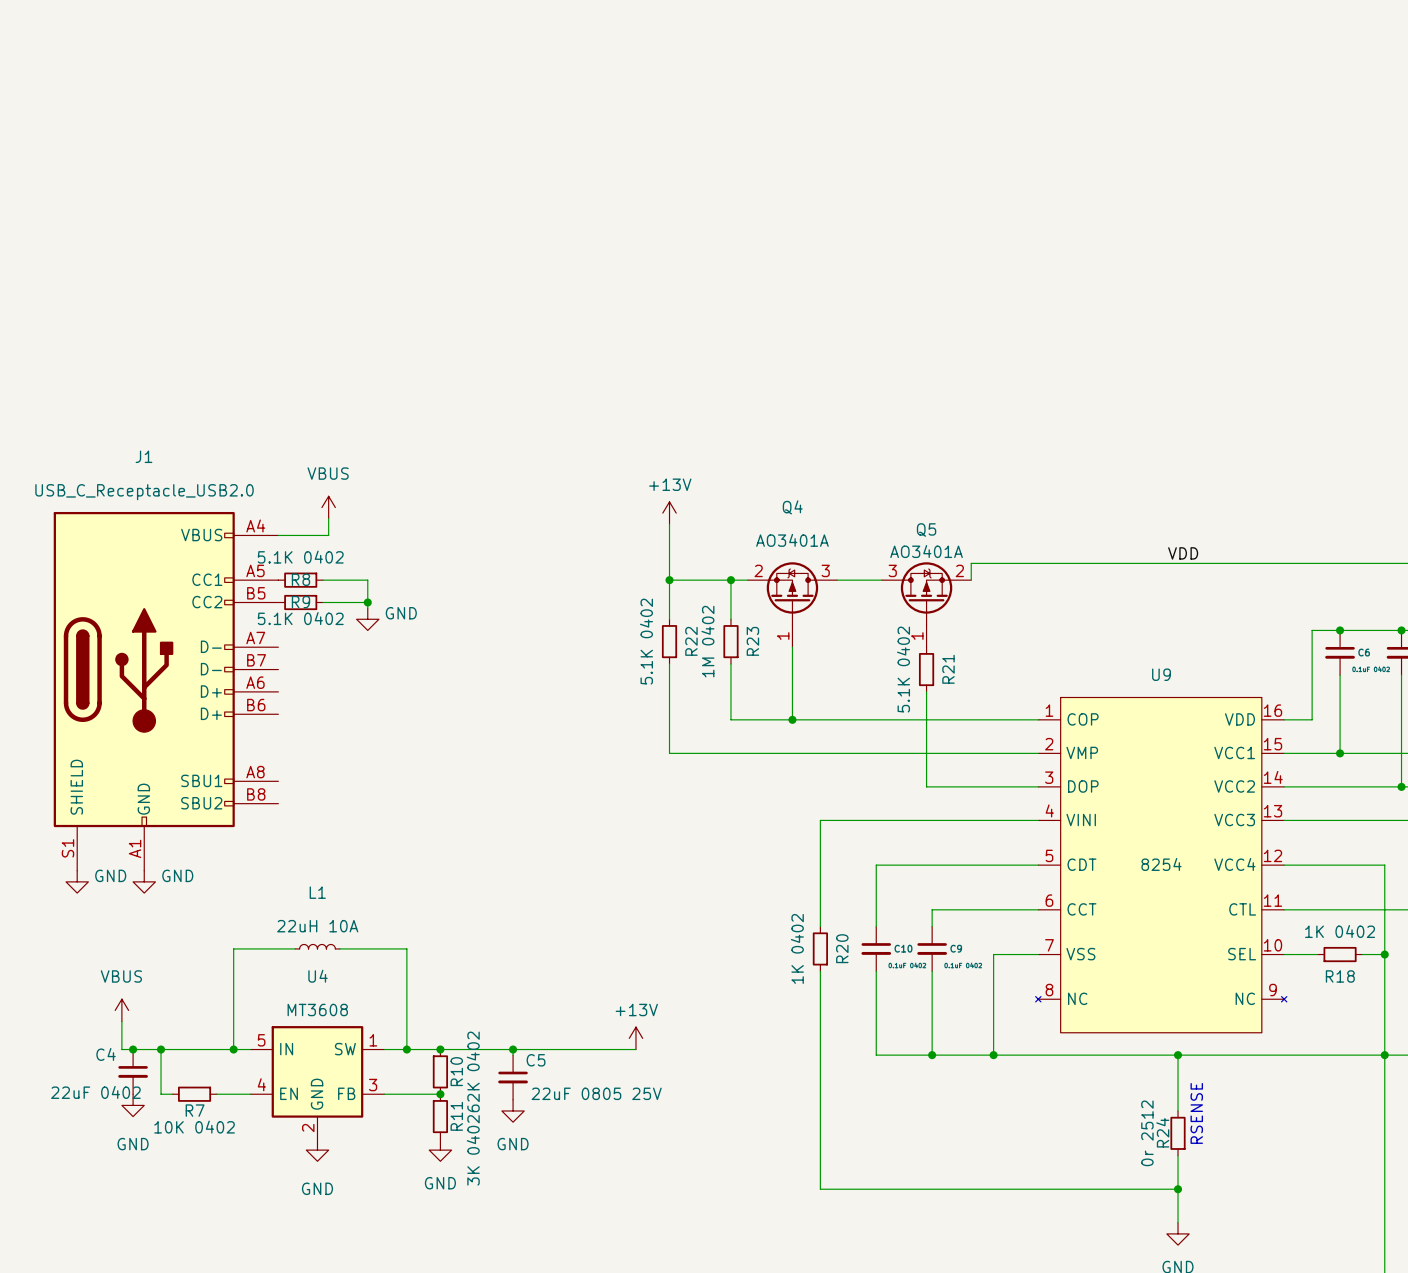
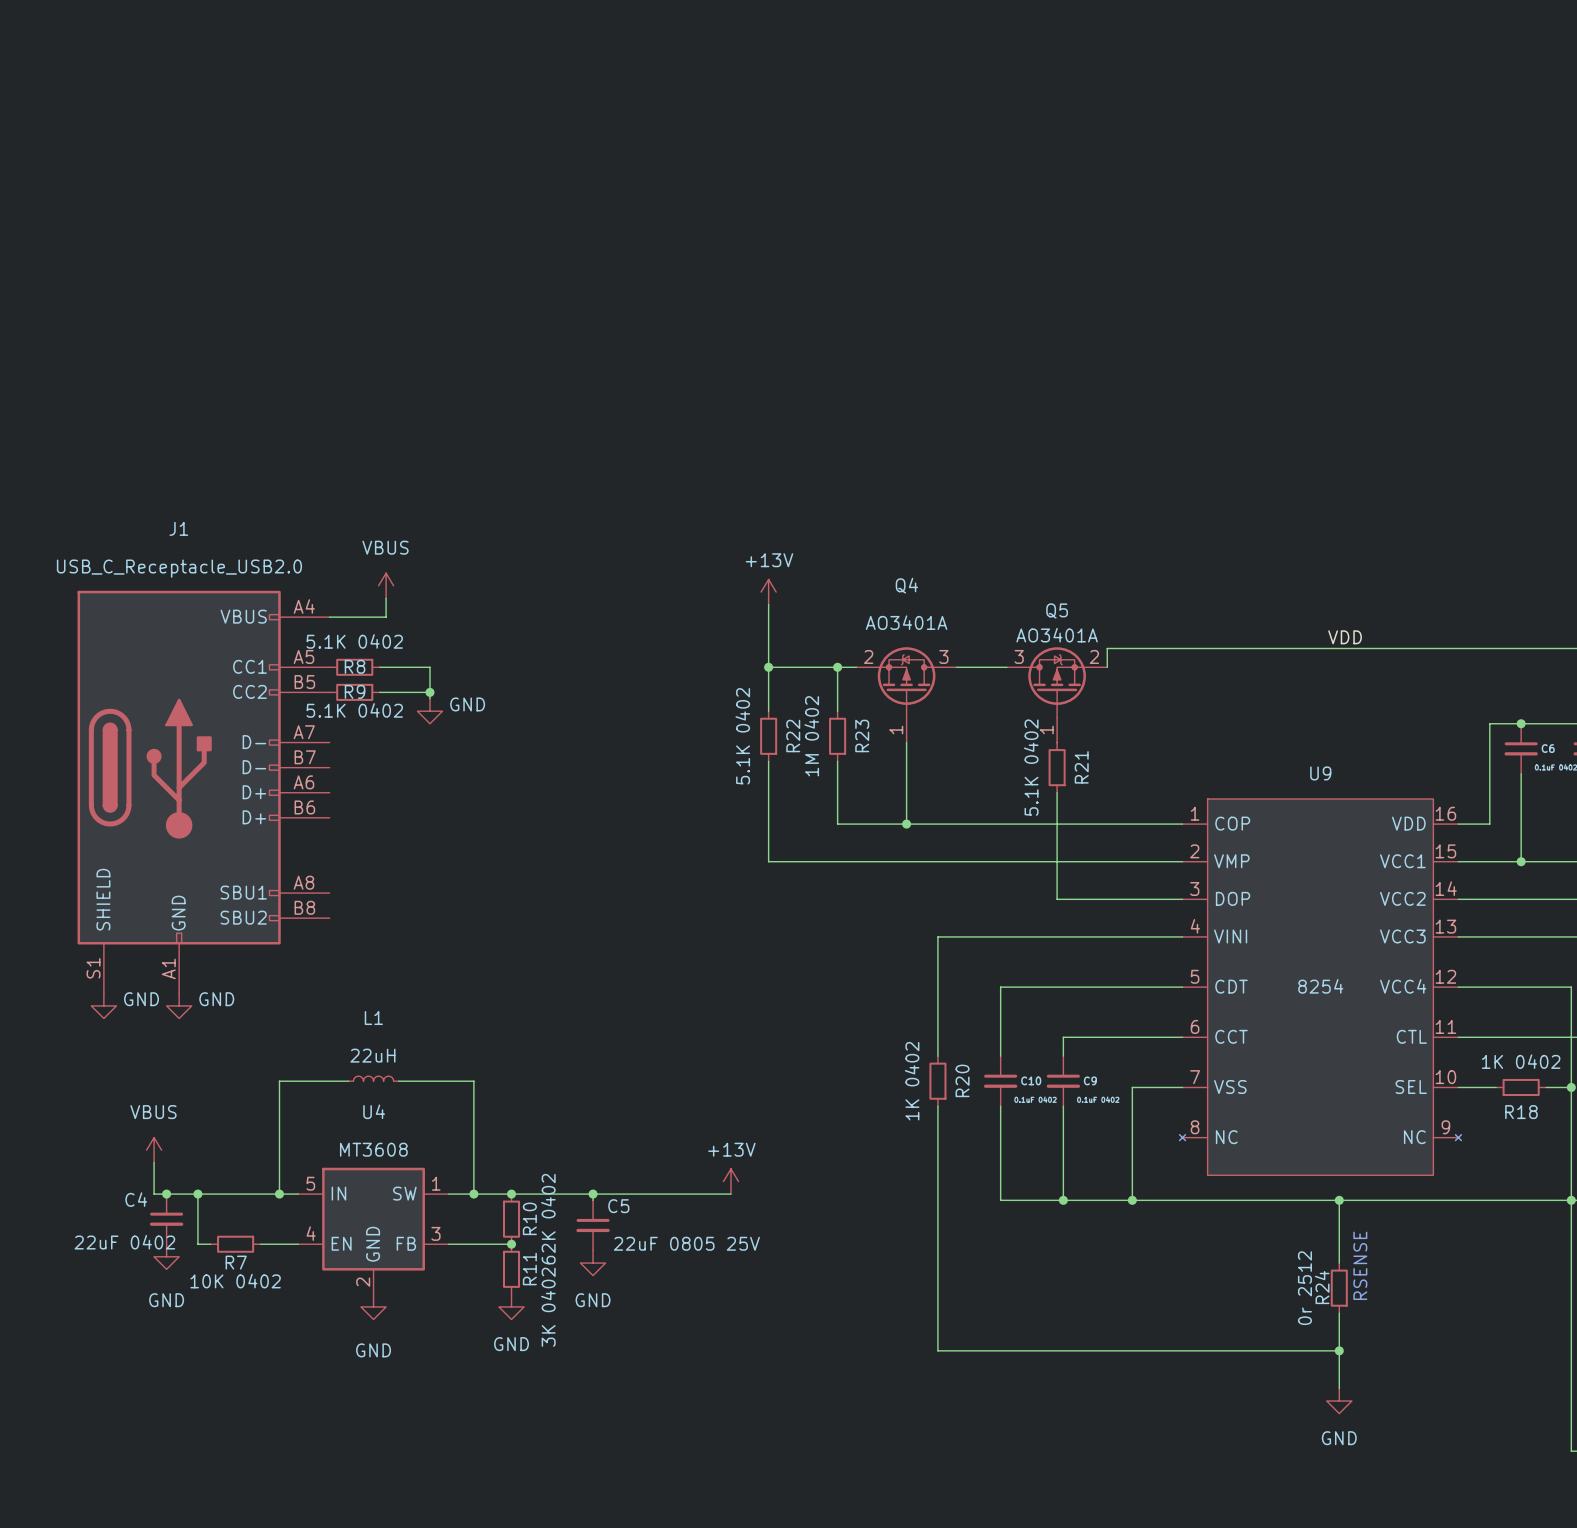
L1 value: 22uH 10A (317, 926) -> 22uH (372, 1055)

